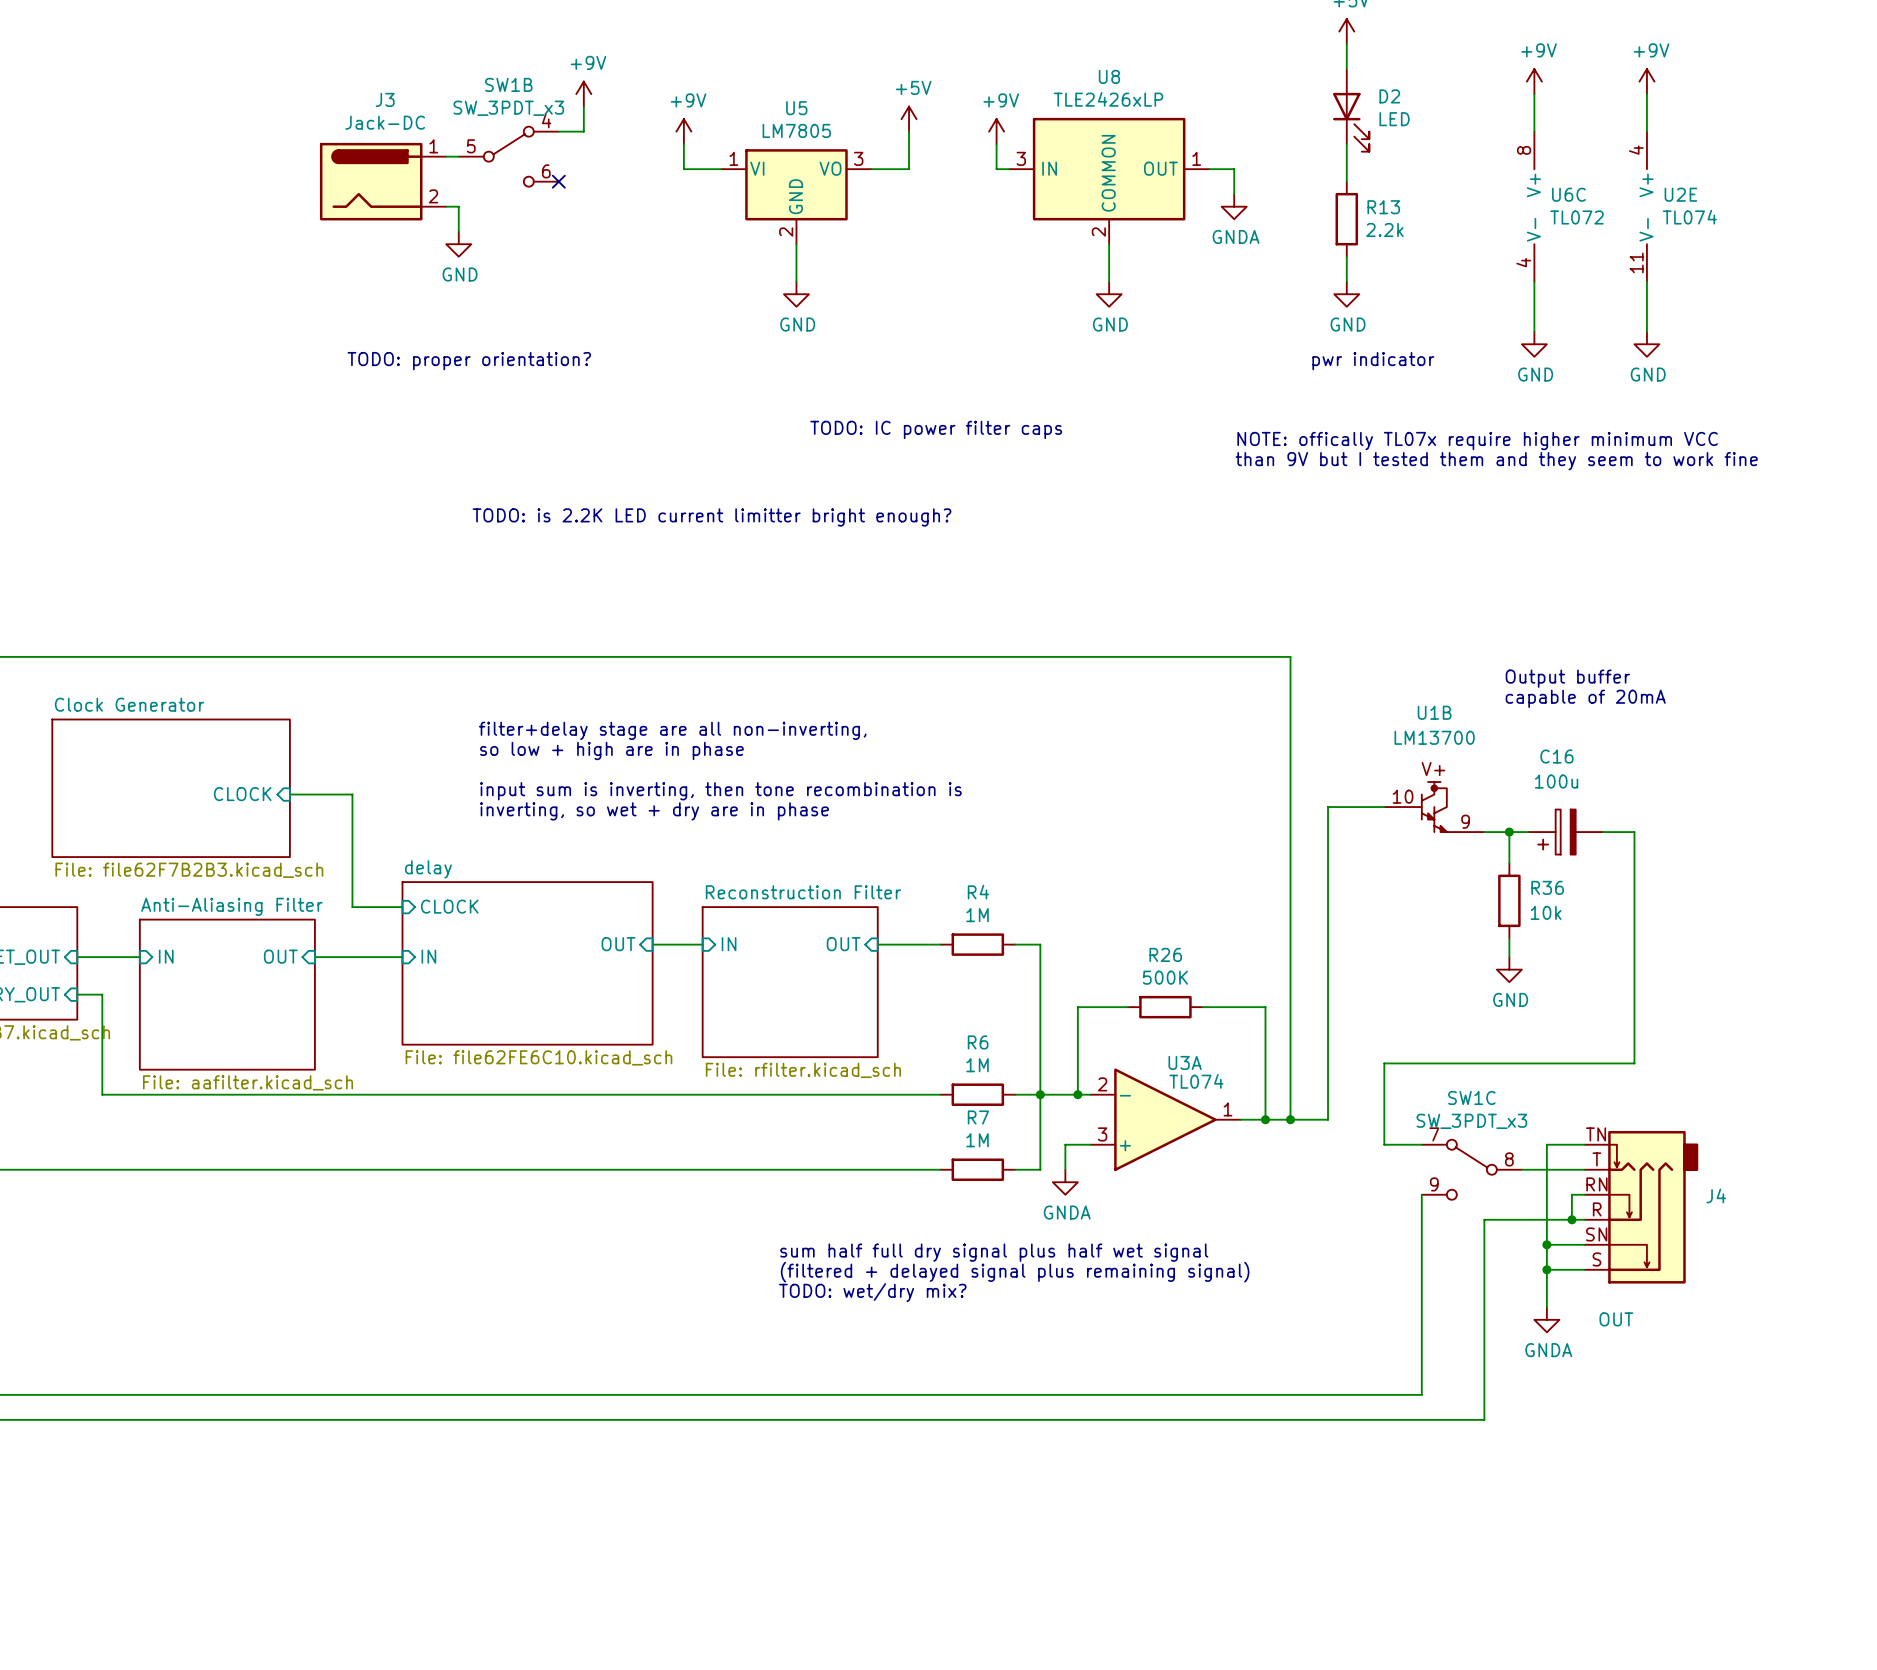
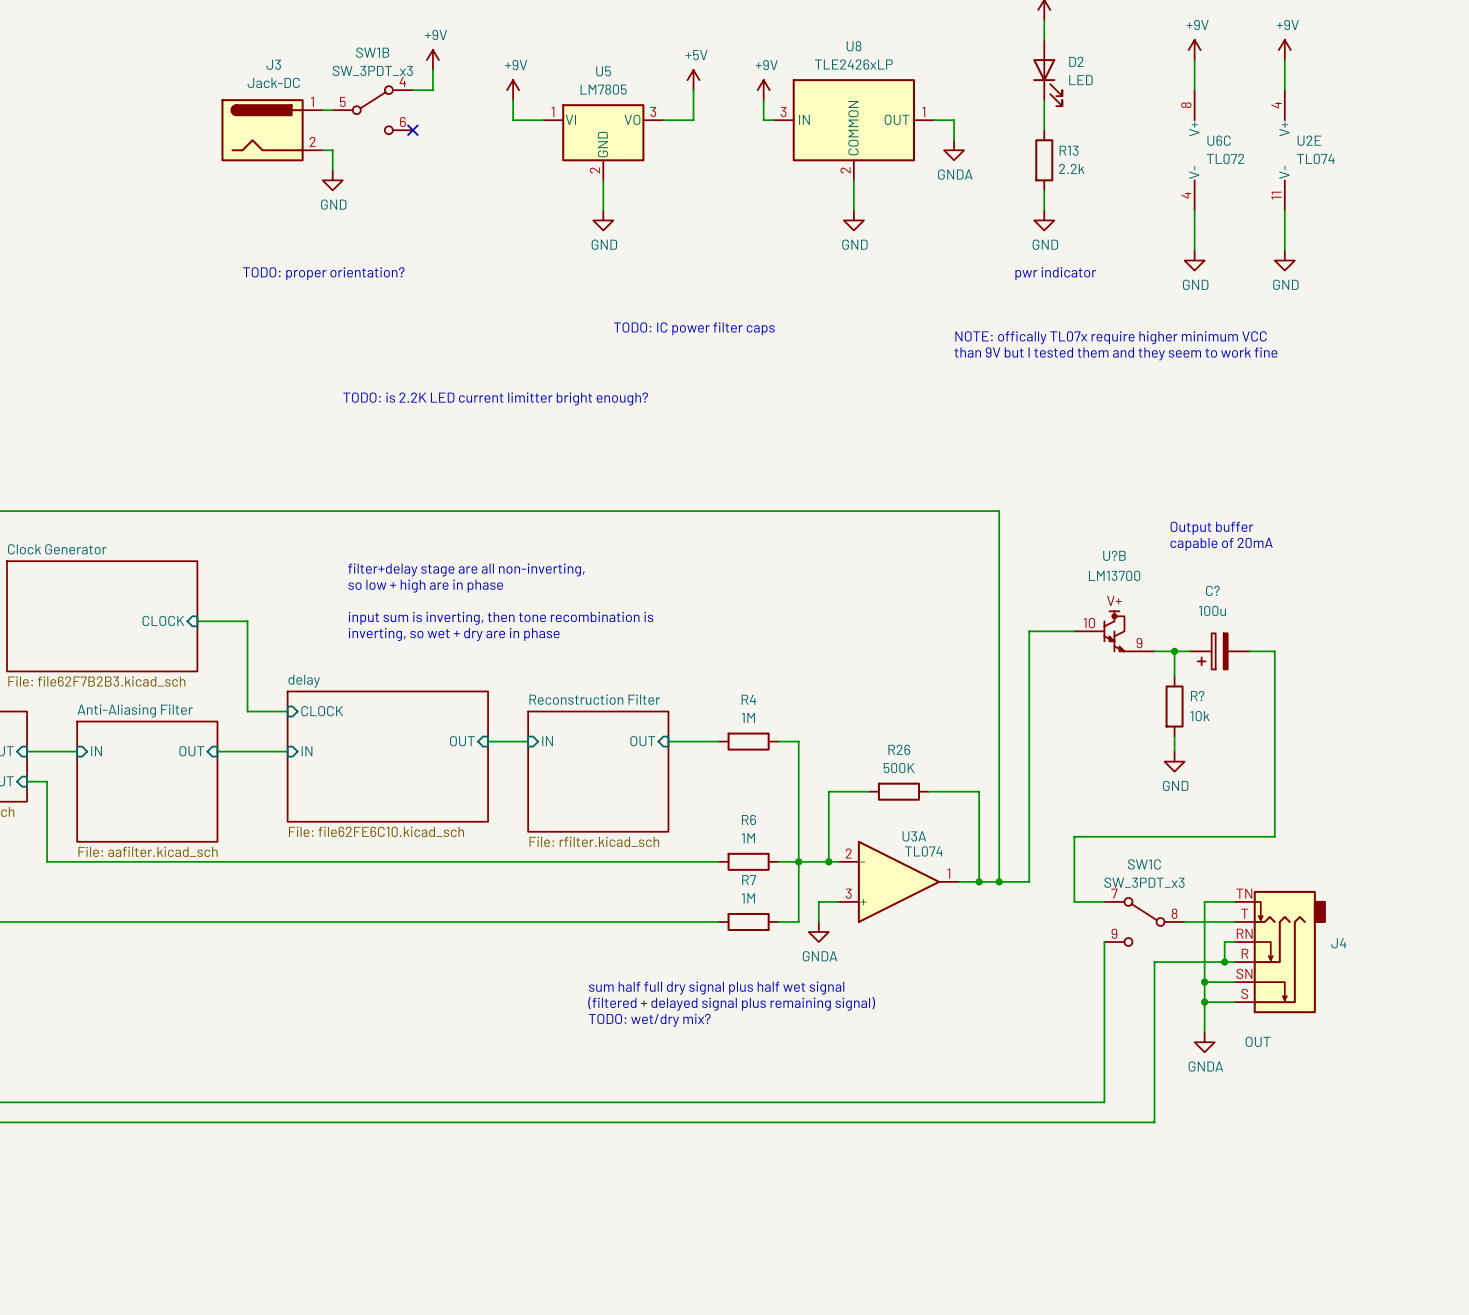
U1B name: U1B (1434, 712) -> U?B (1114, 555)
C16 name: C16 (1556, 756) -> C? (1212, 590)
R36 name: R36 (1547, 887) -> R? (1197, 696)

